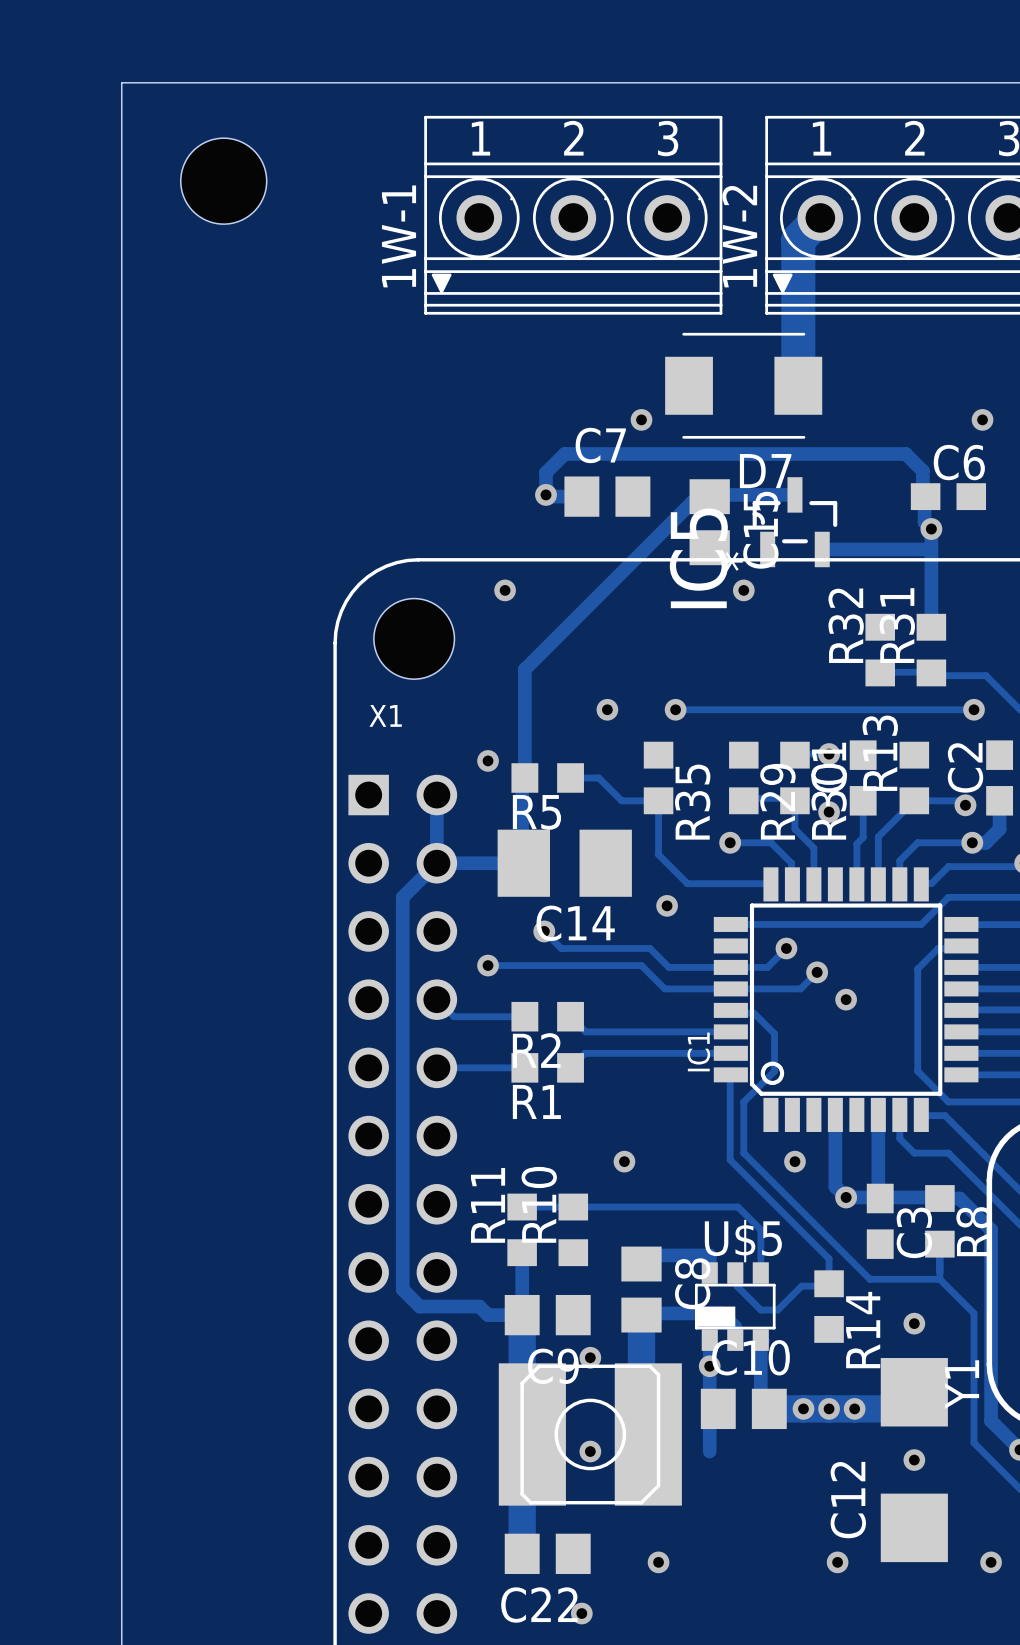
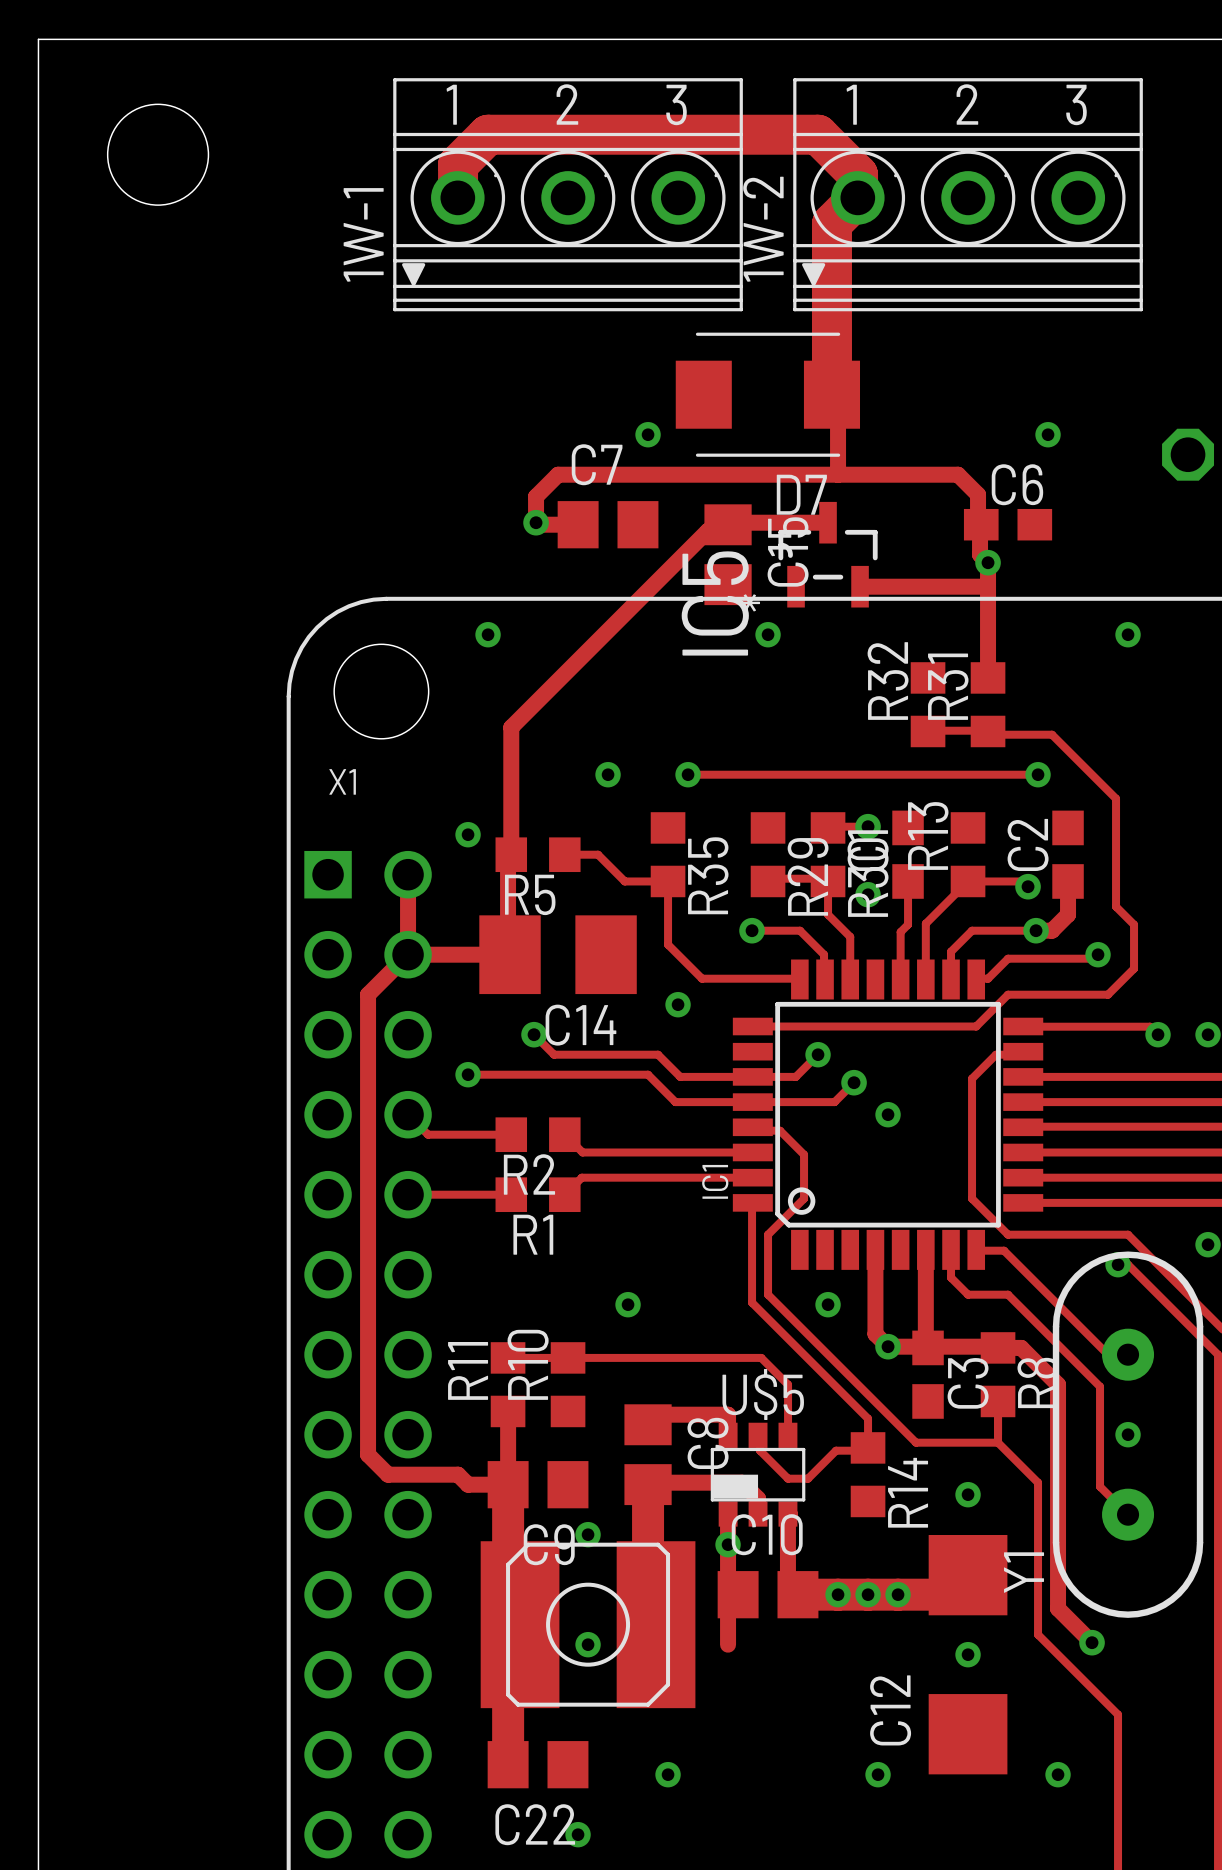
track: none -> (458, 184) (458, 164) (488, 134) (818, 134) (858, 174) (858, 197)
track: none -> (831, 394) (838, 394) (838, 474)

